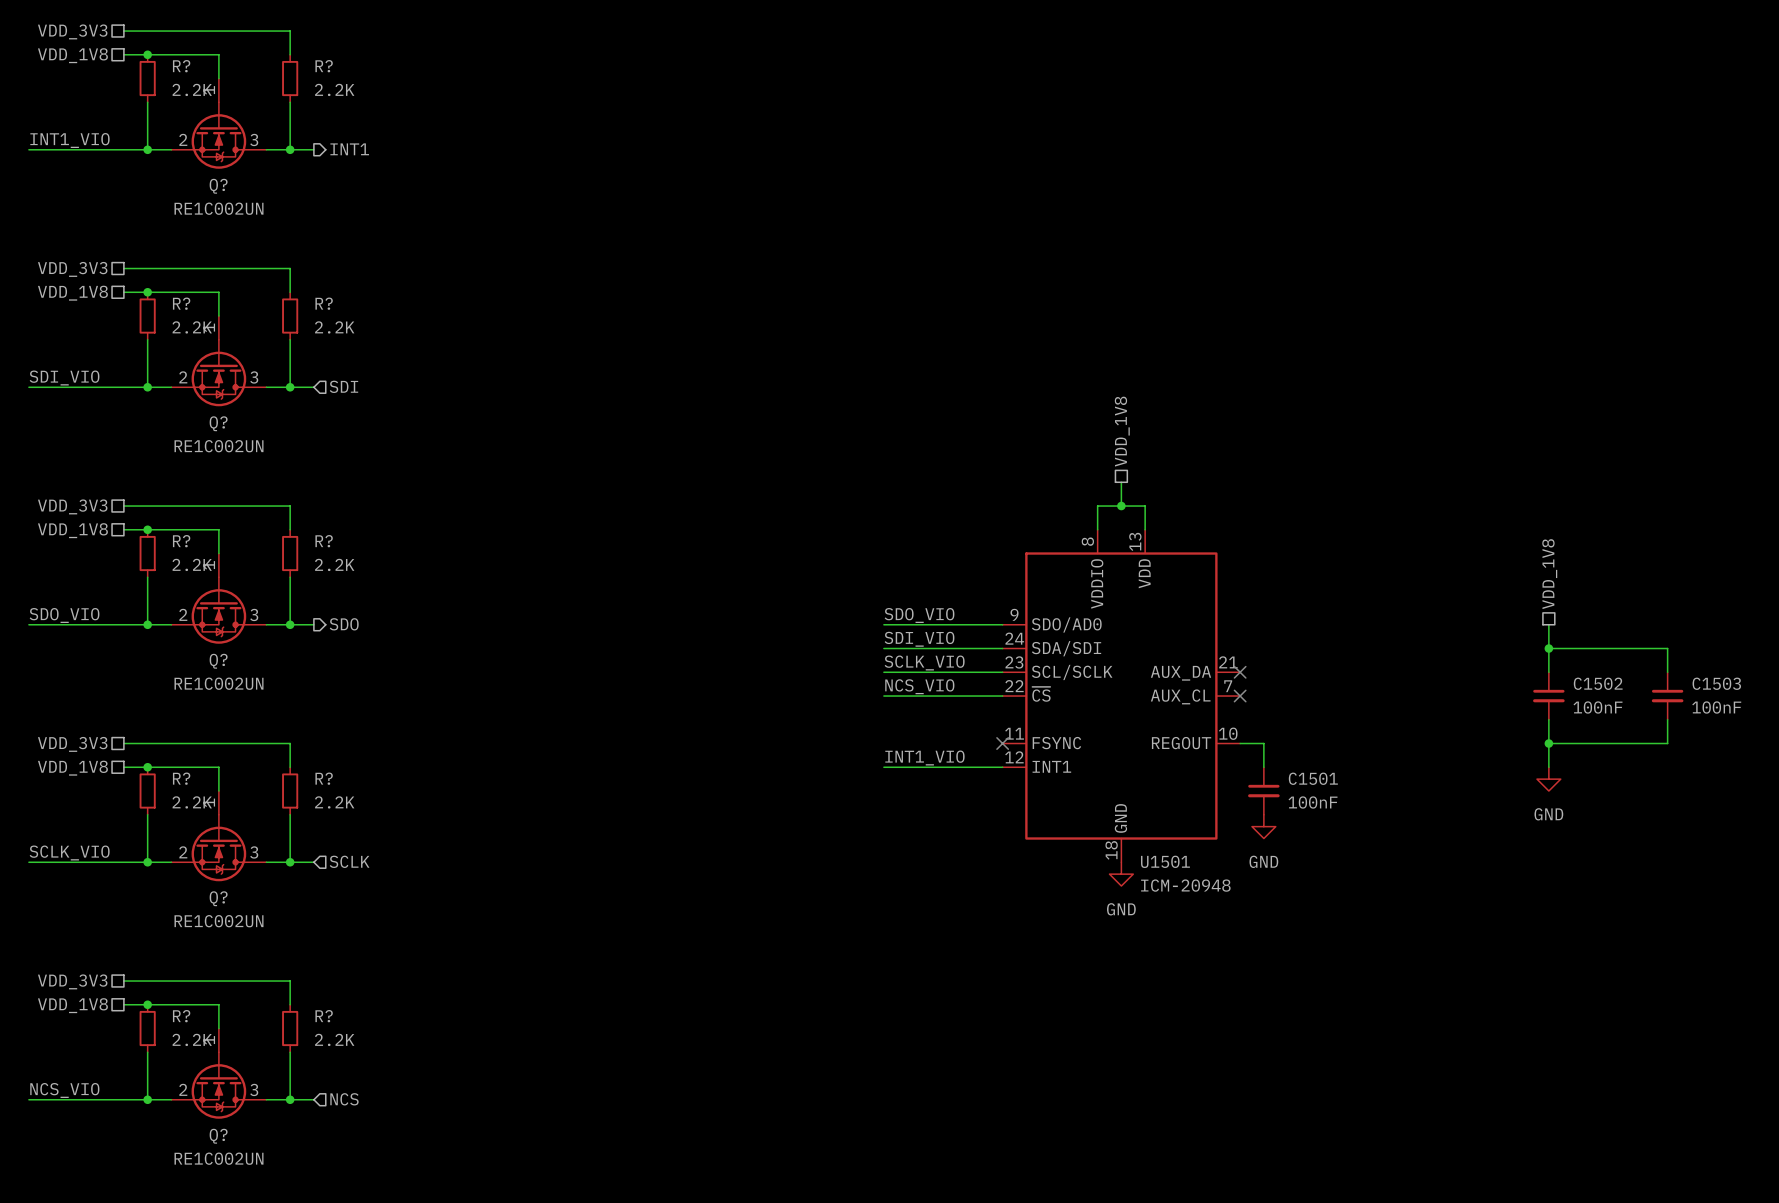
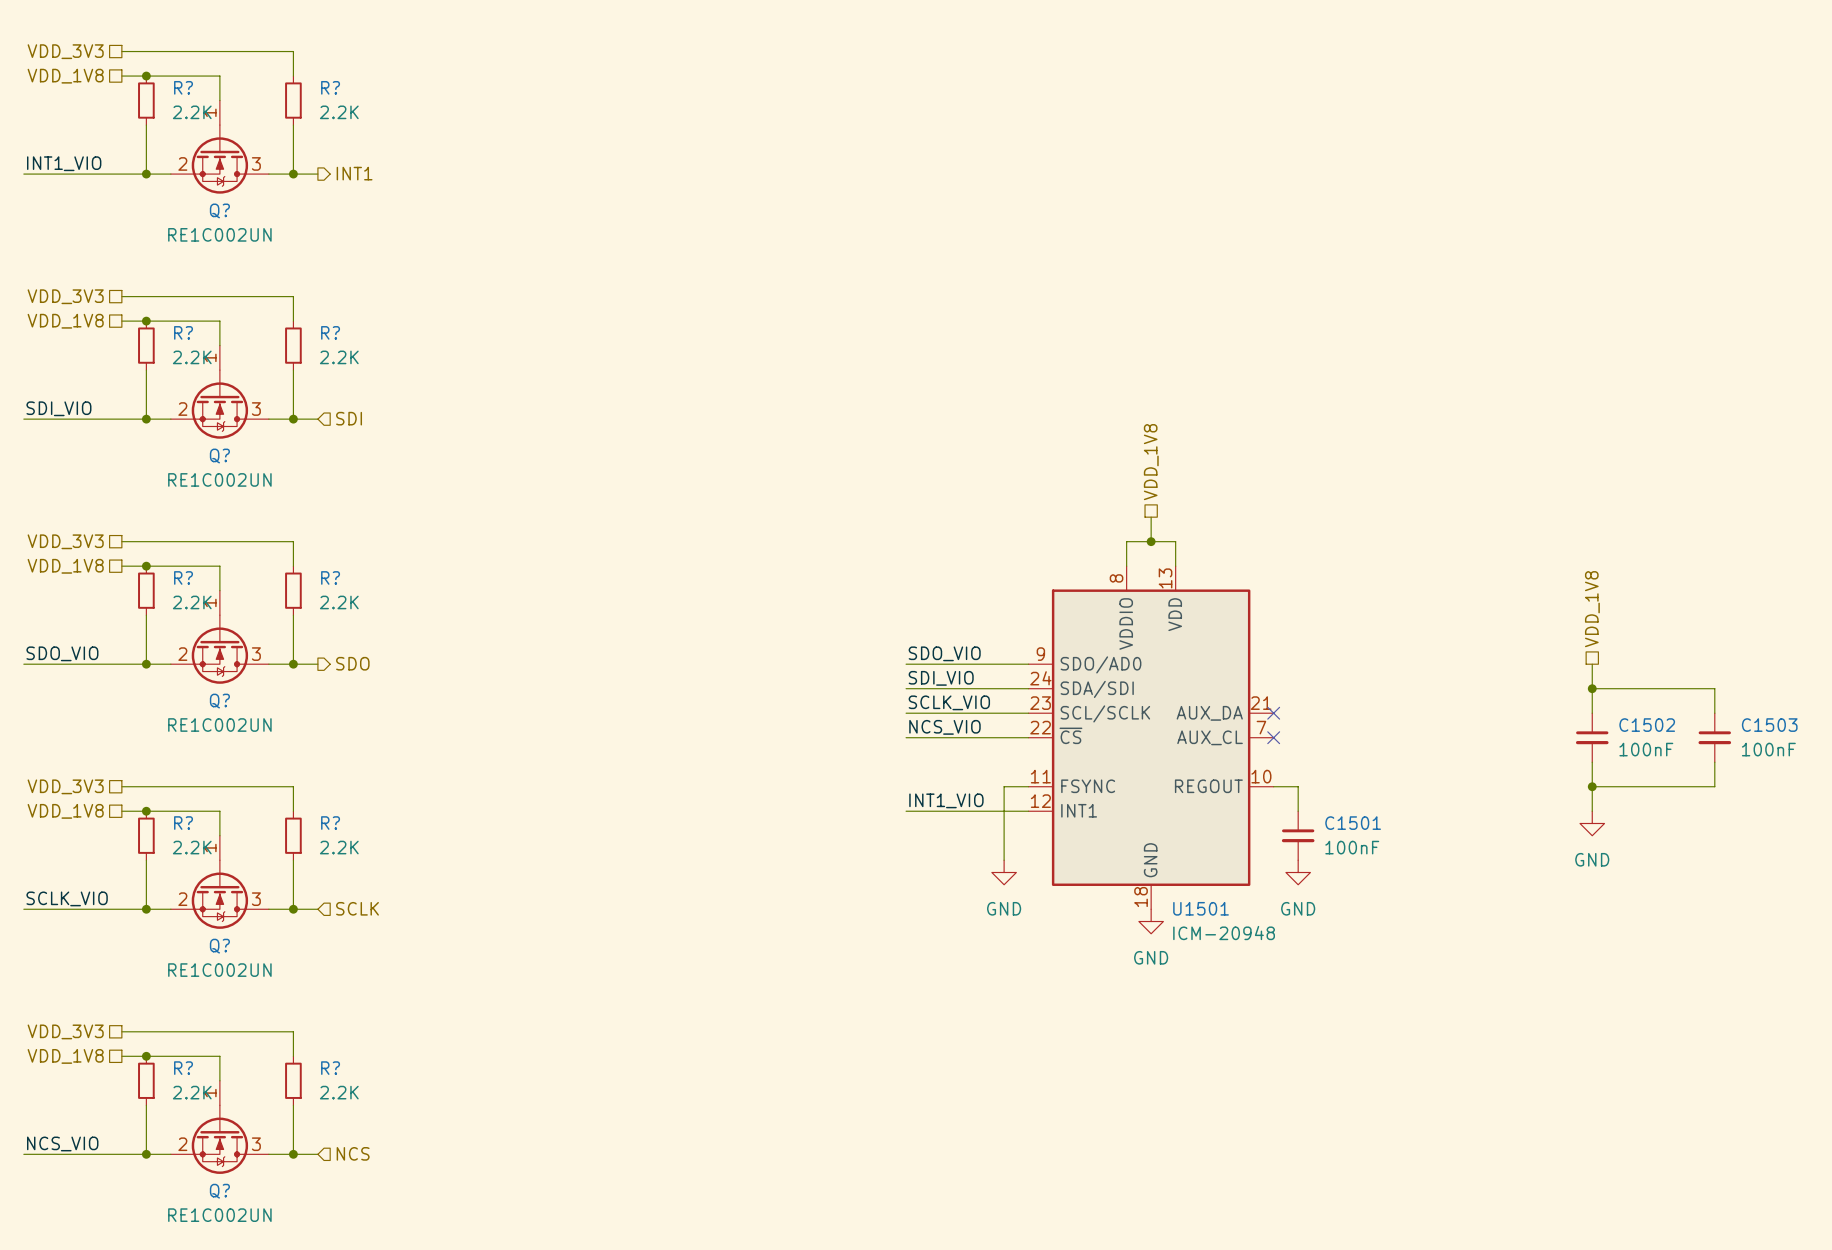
wire: none -> (1028, 786) (1004, 786) (1004, 860)
no-connect mark: (1002, 743) -> none
power symbol: none -> GND (1004, 872)

